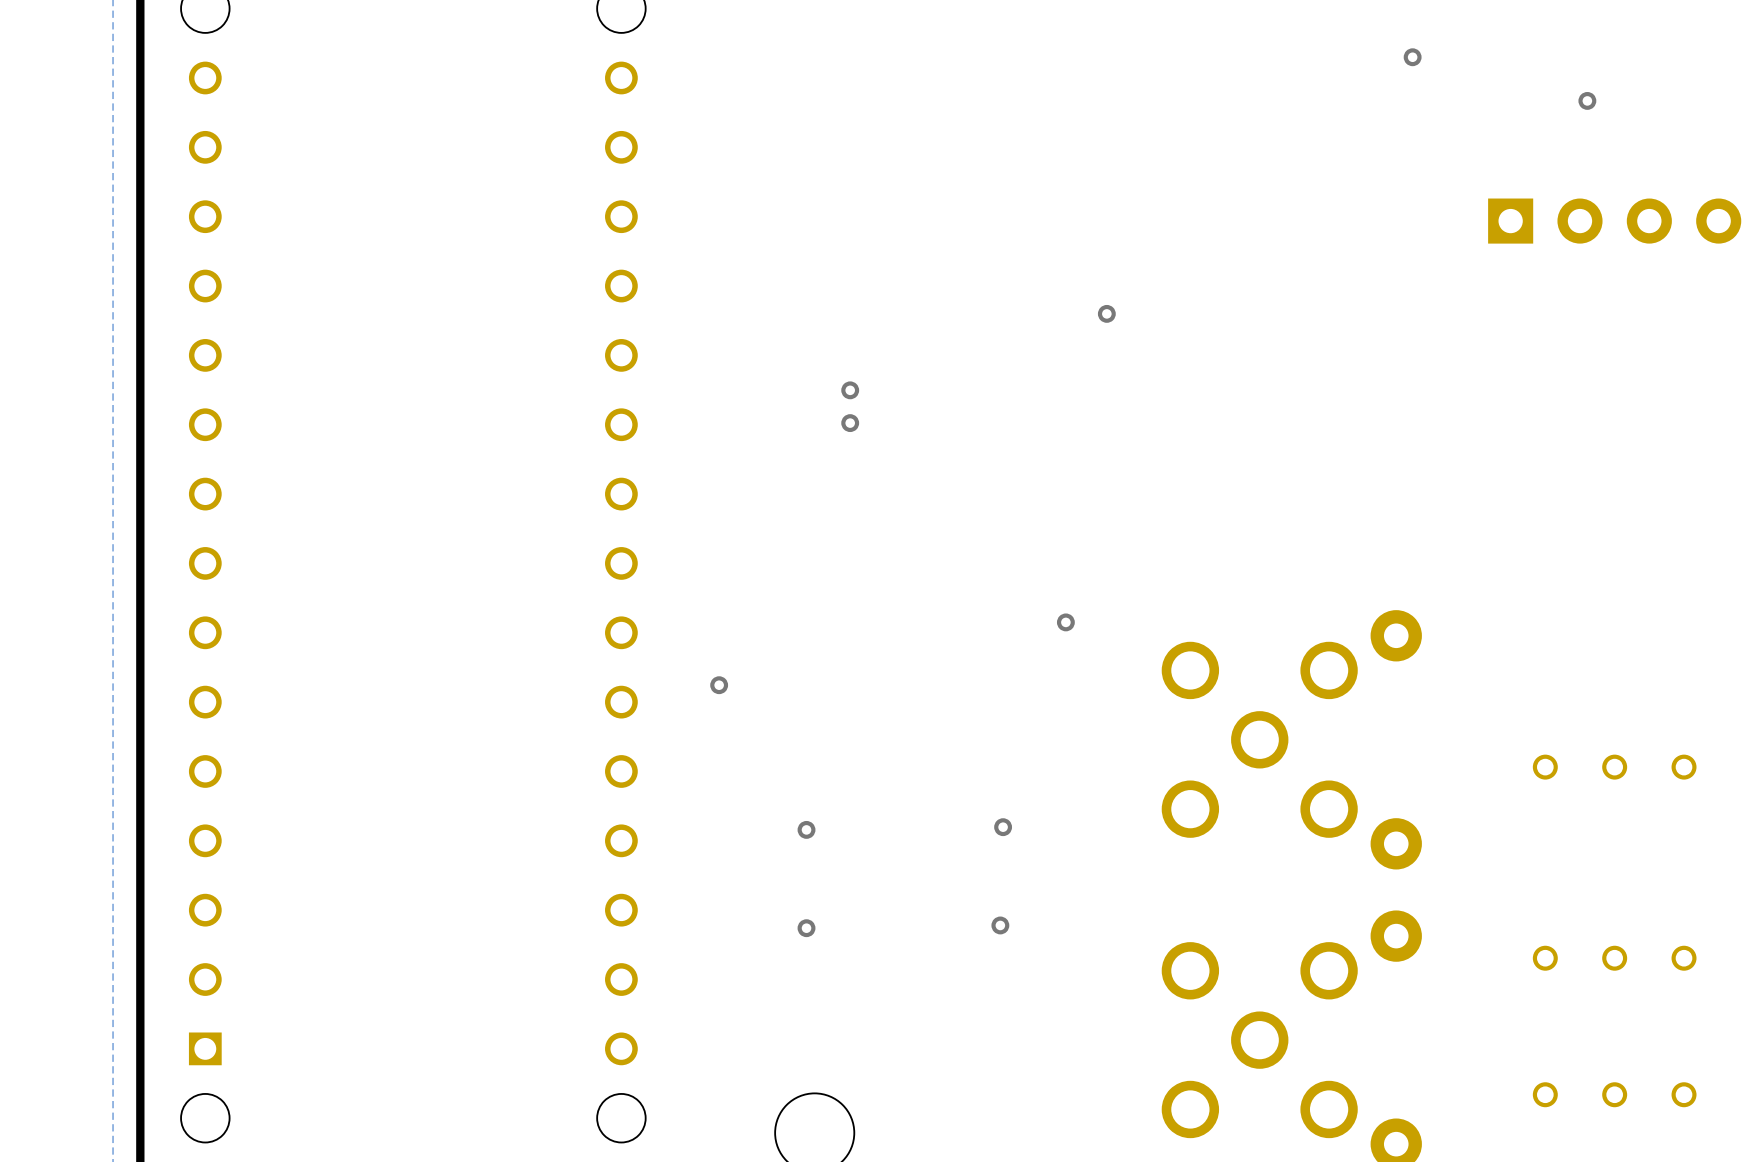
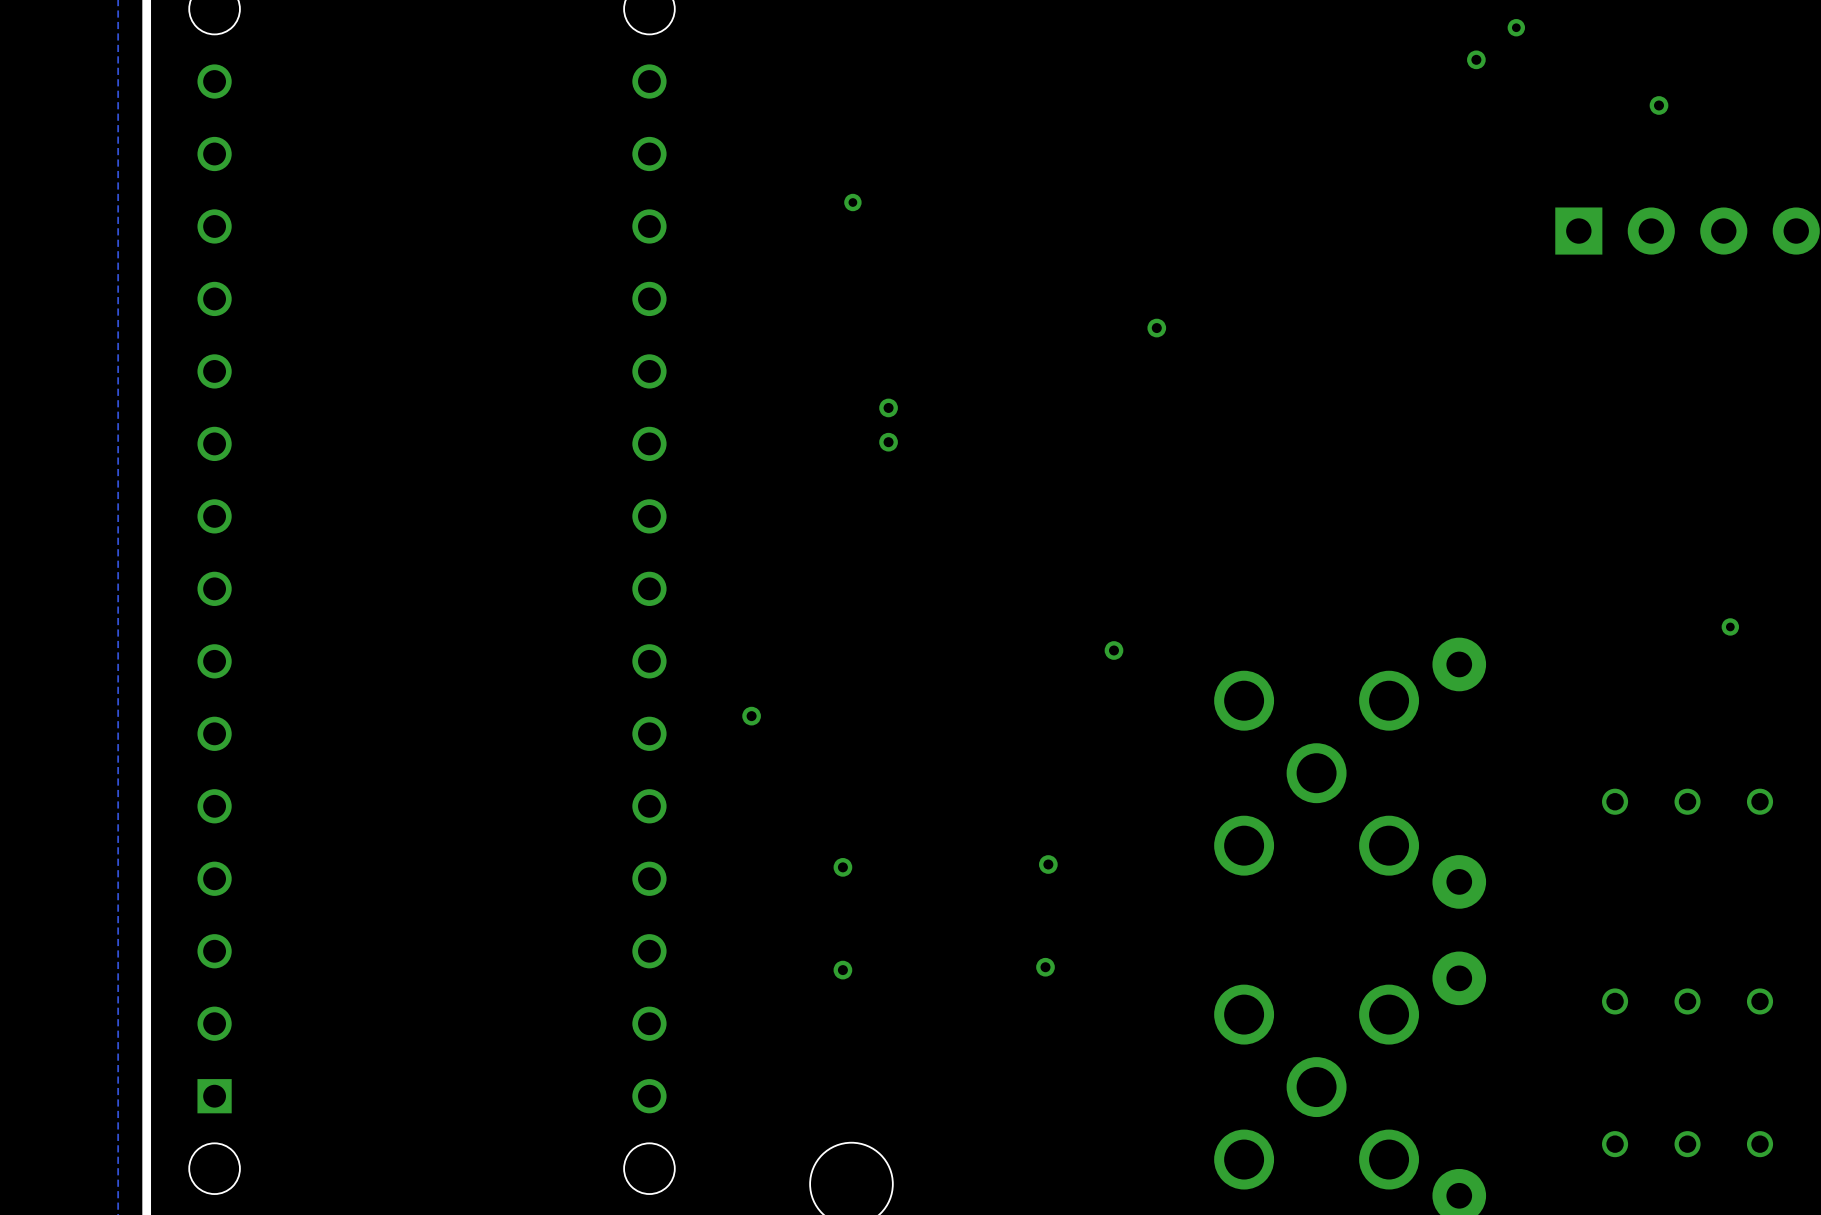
via: none -> (1516, 27)
via: none -> (852, 202)
via: none -> (1730, 626)

